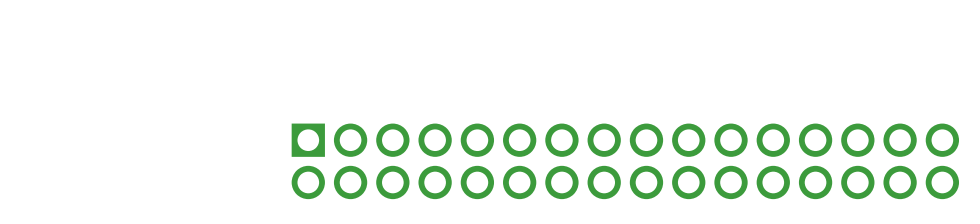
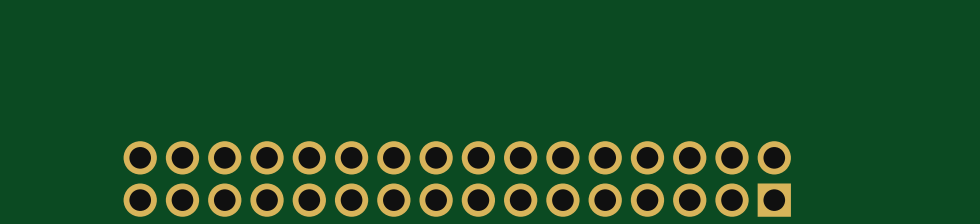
part rotation: 0° (625, 161) -> 180° (457, 178)

